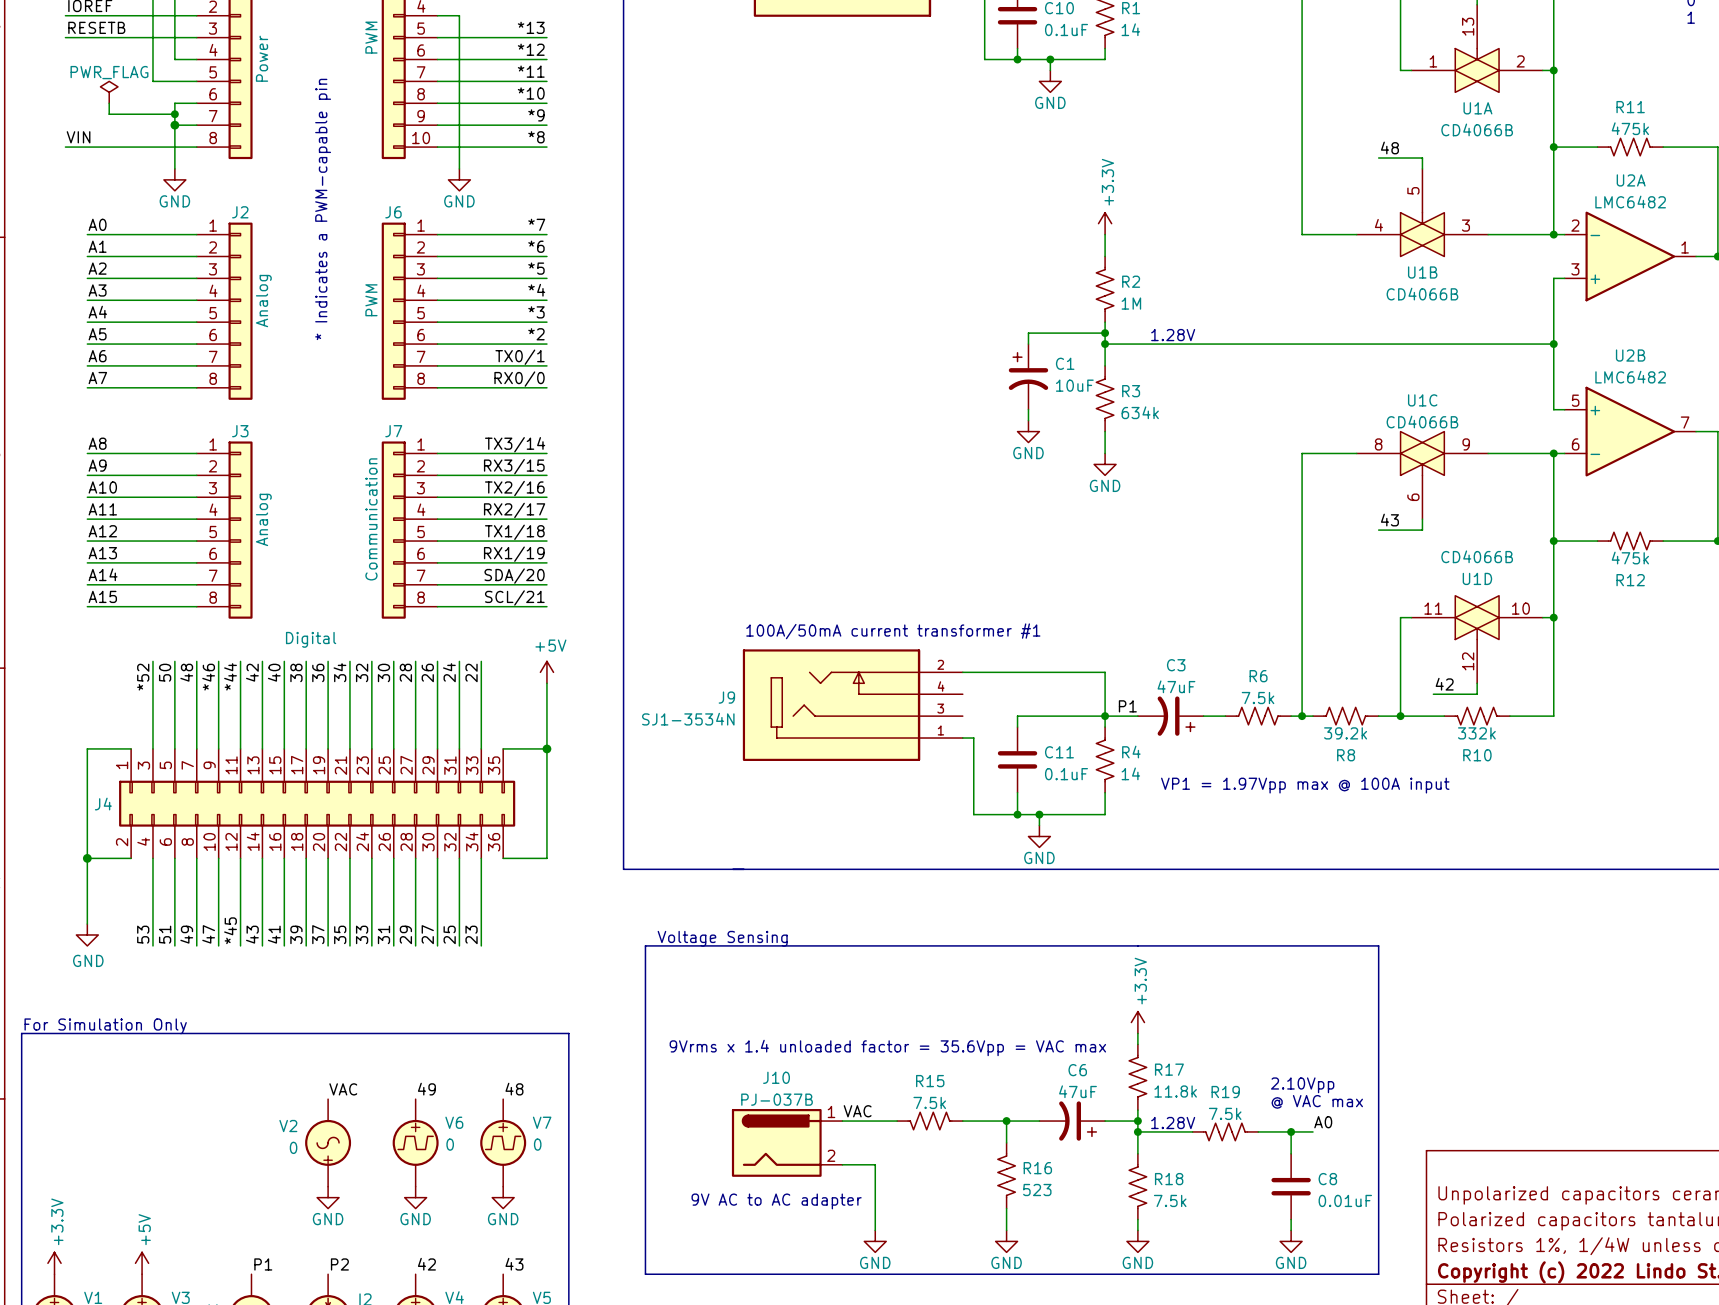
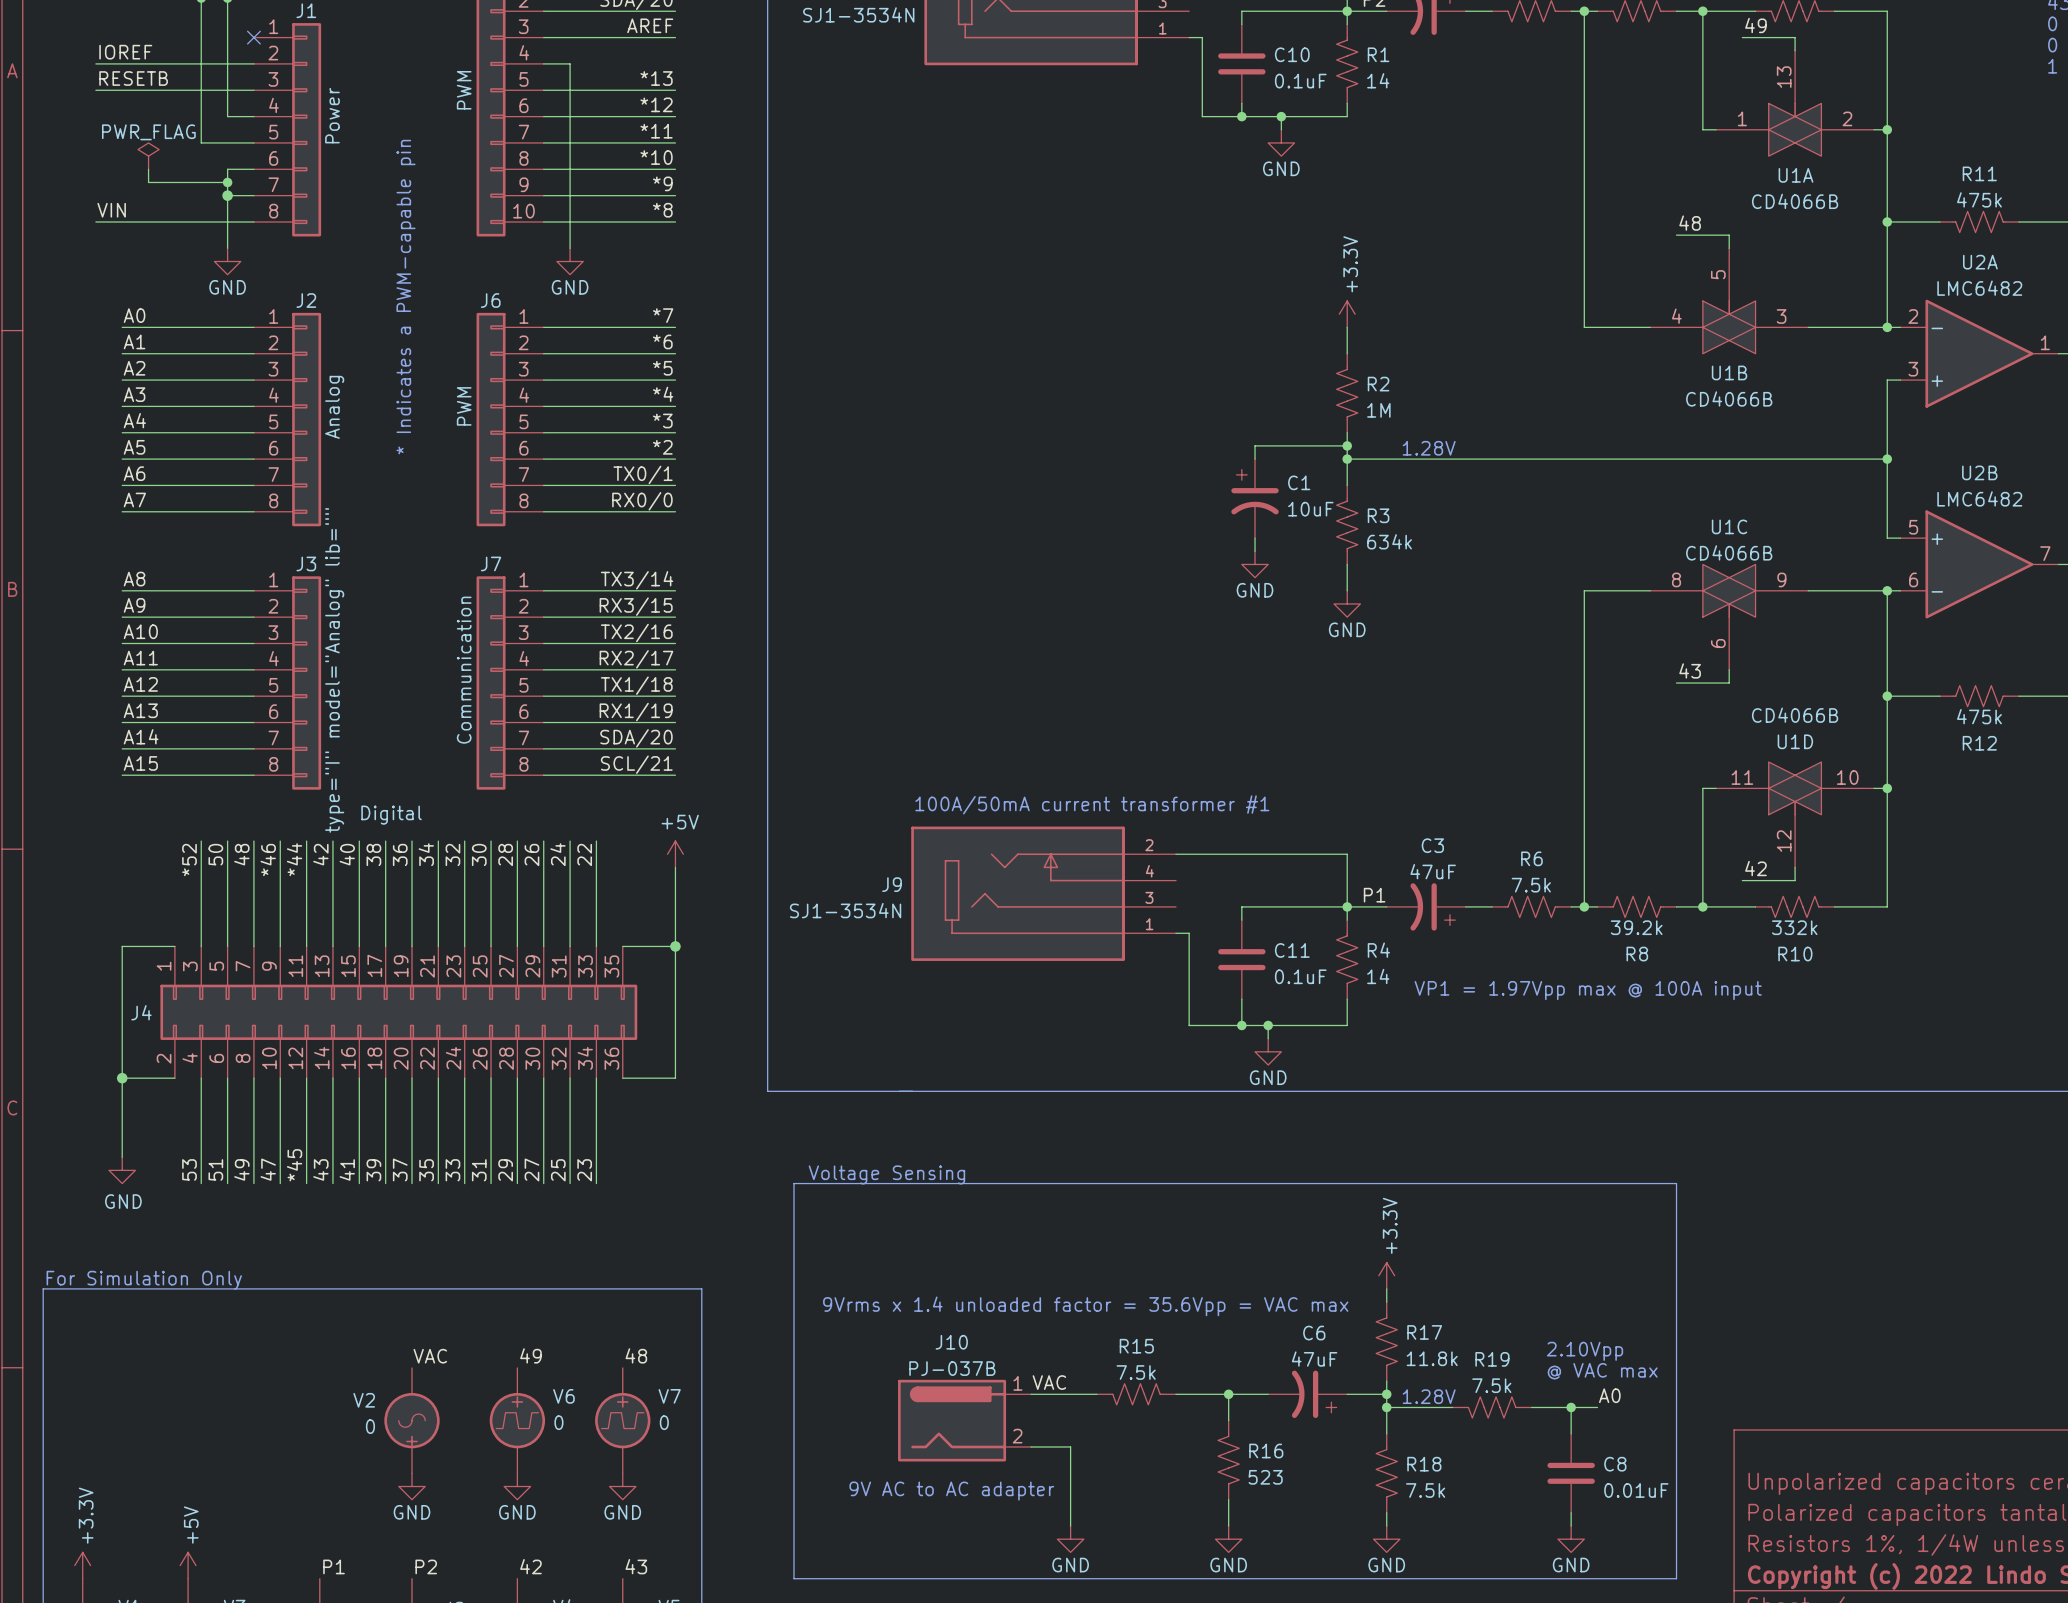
J3 value: Analog (263, 519) -> type="I" model="Analog" lib="" (334, 670)

